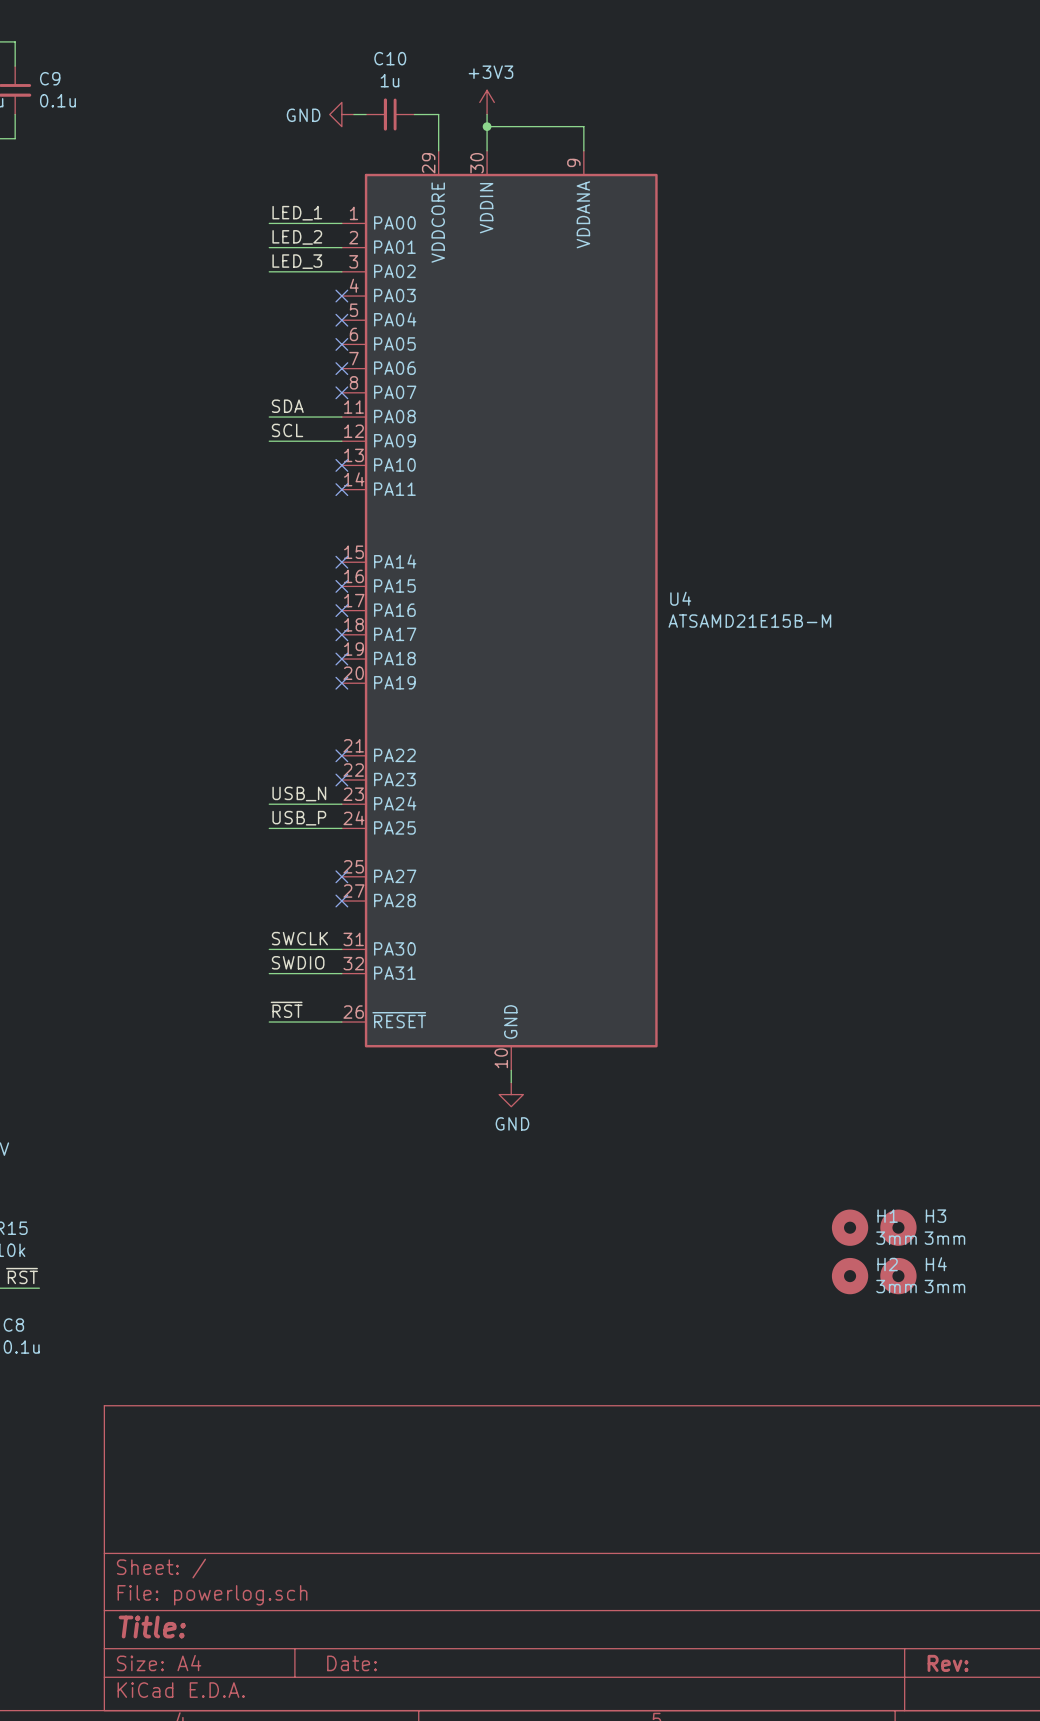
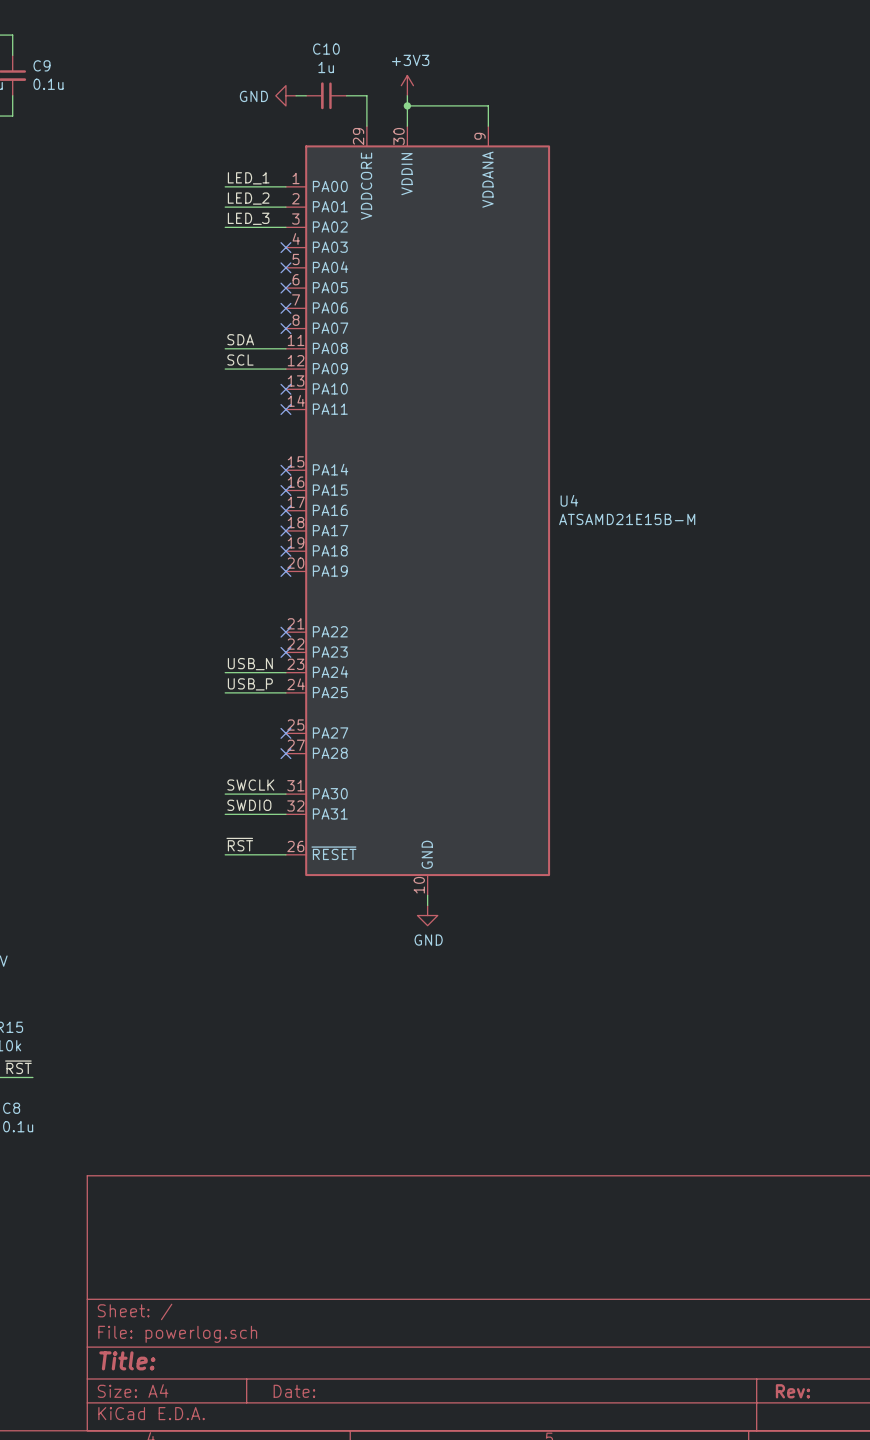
H1: 3mm (850, 1227) -> none
H3: 3mm (898, 1227) -> none
H2: 3mm (850, 1276) -> none
H4: 3mm (898, 1276) -> none

